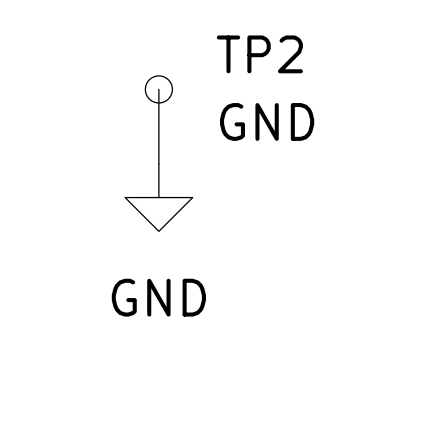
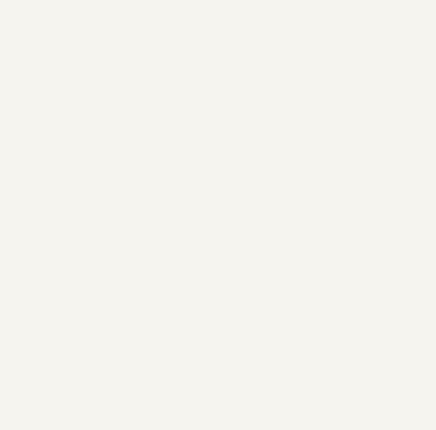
wire: (158, 89) (158, 163) -> none
TP2: GND (158, 89) -> none
power symbol: GND (158, 197) -> none

